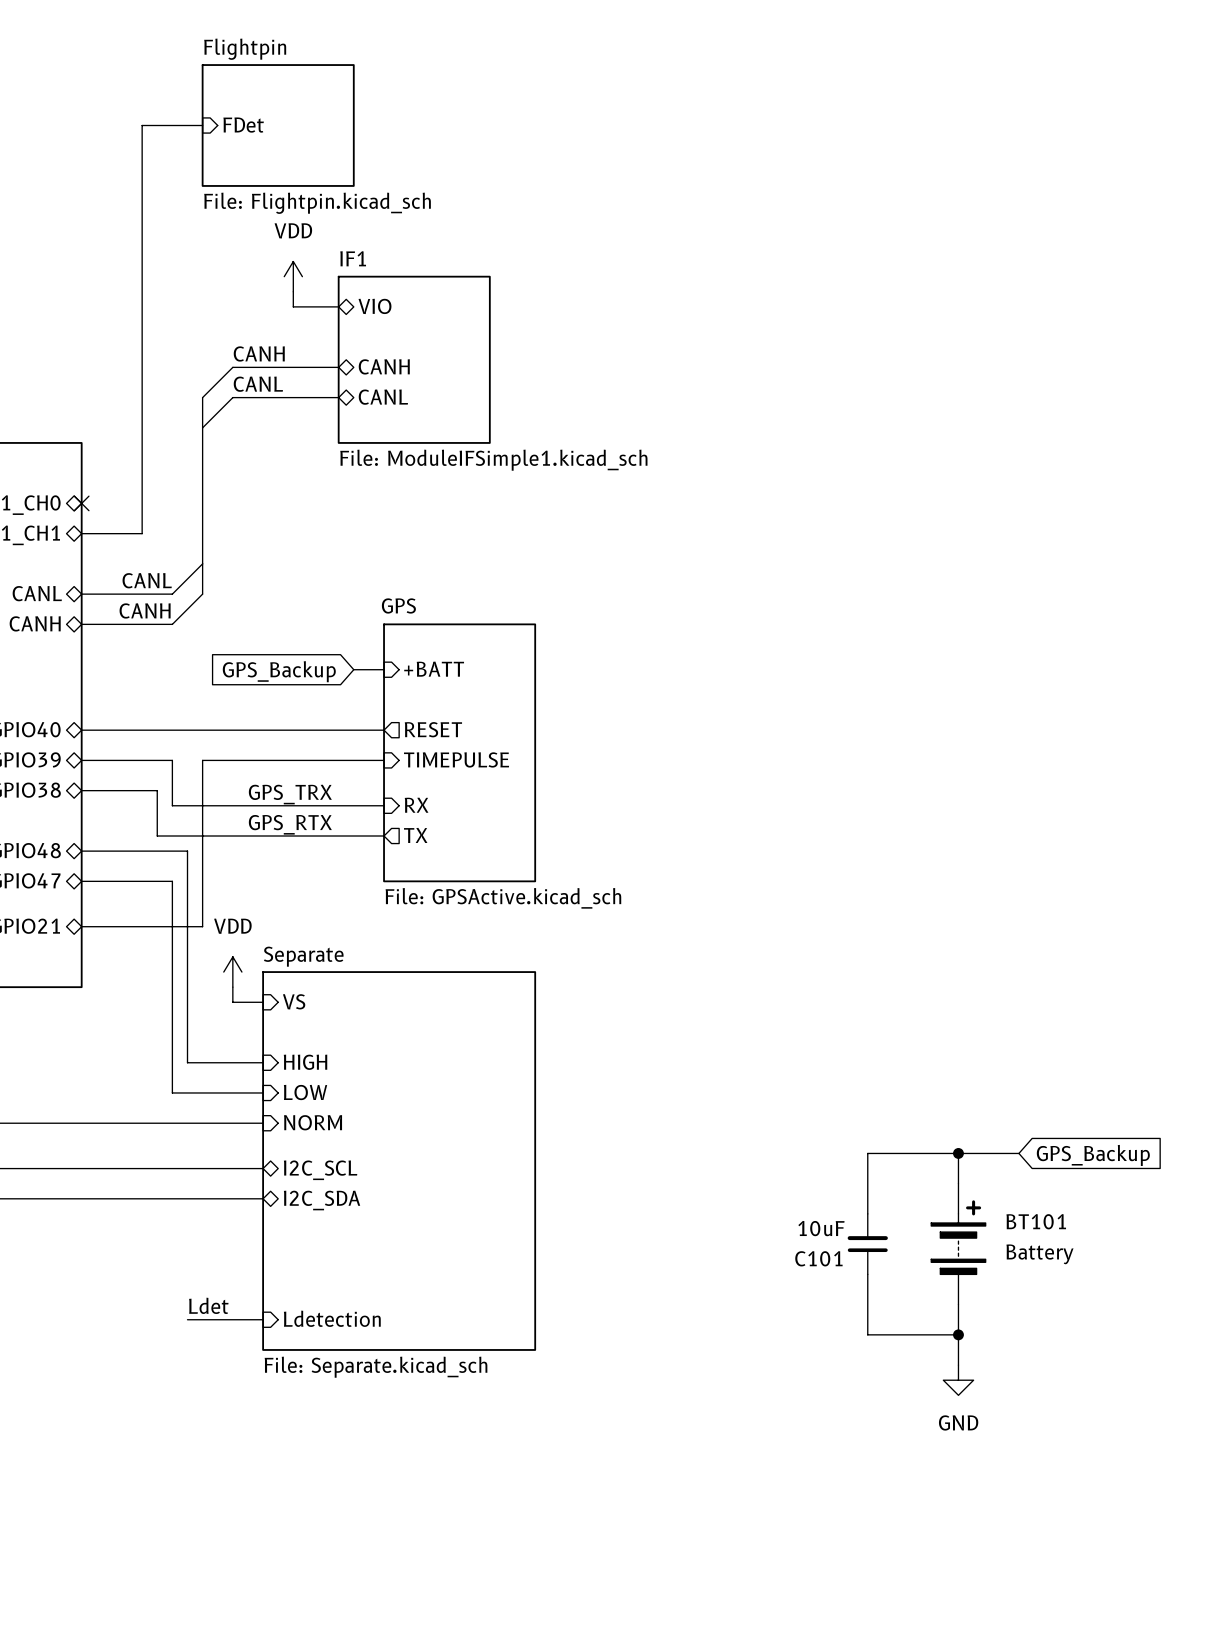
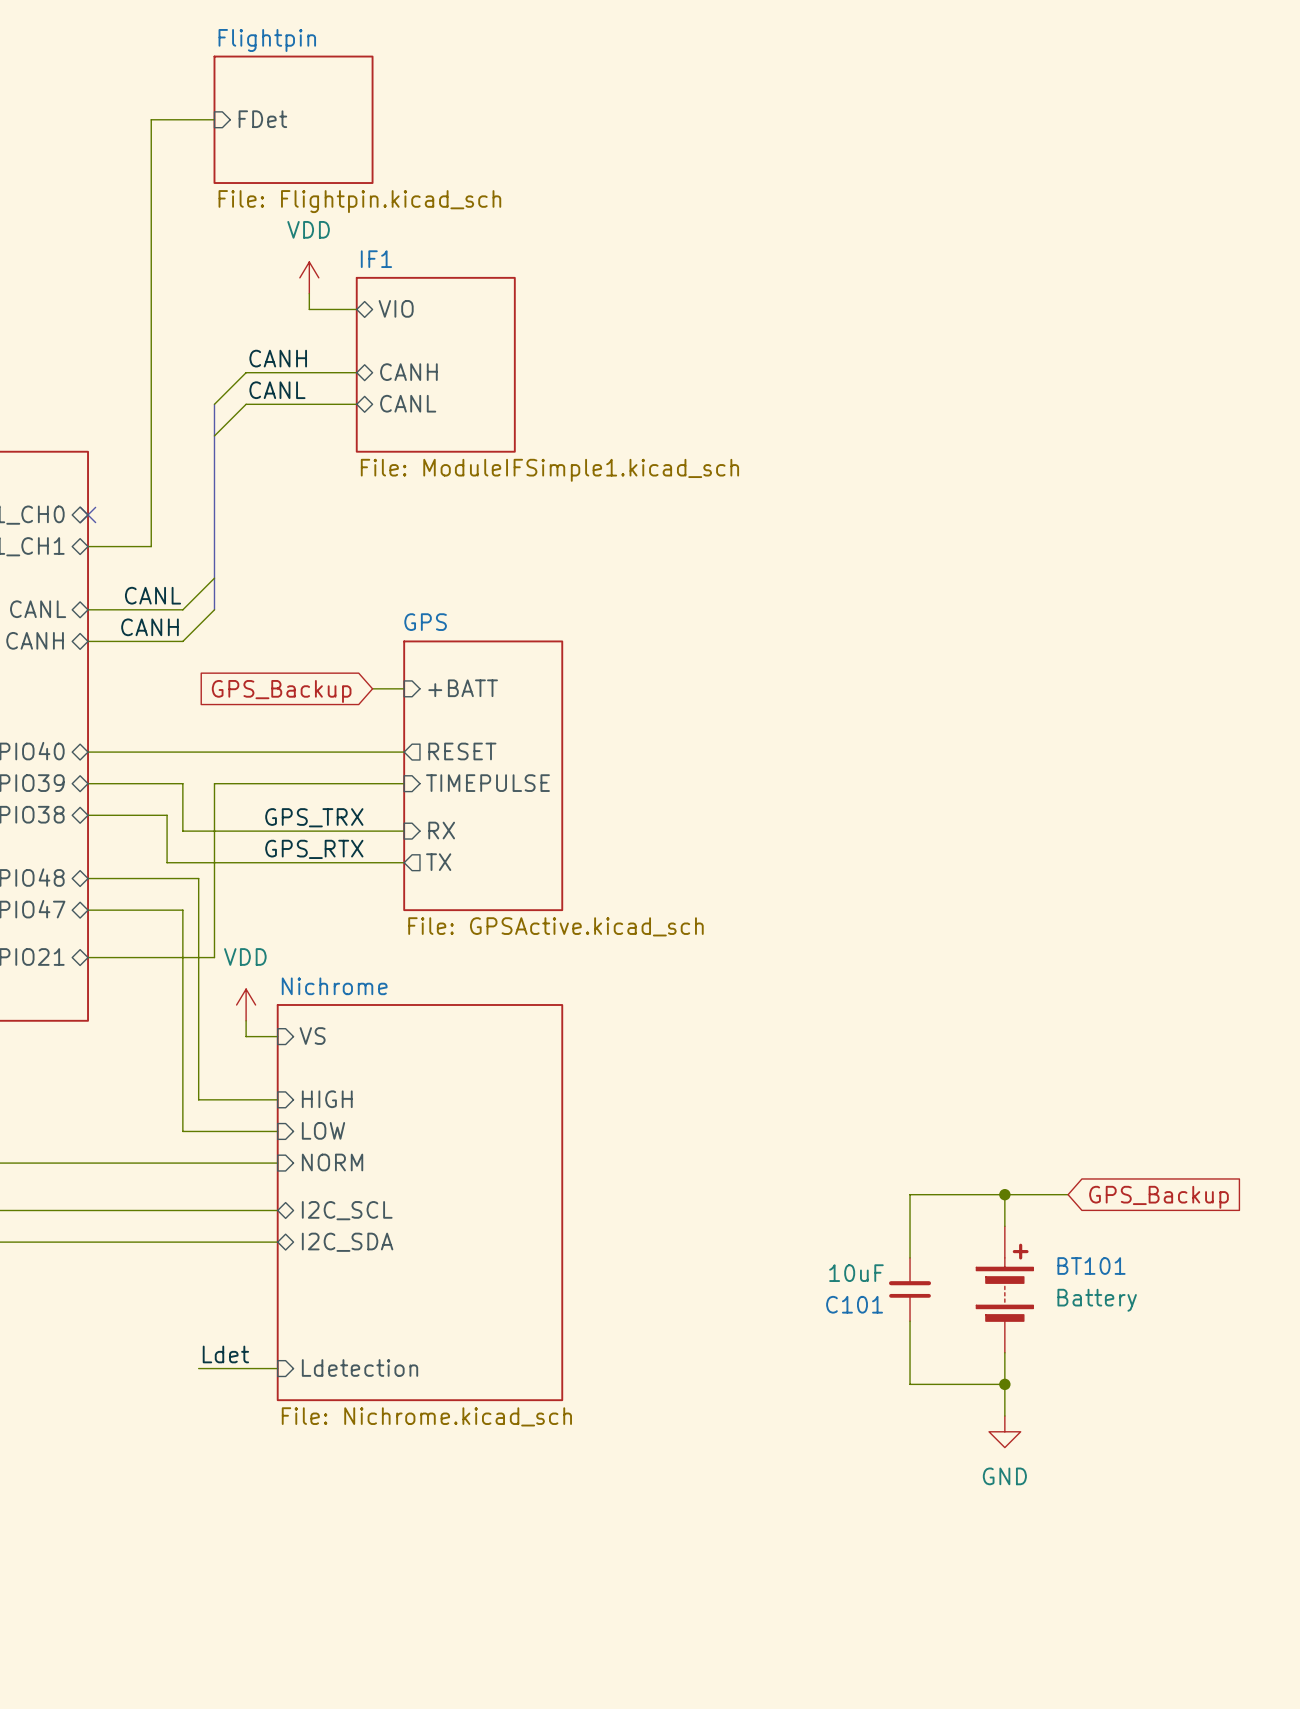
sheet Separate name: Separate (303, 956) -> Nichrome (334, 986)
sheet Separate value: File: Separate.kicad_sch (376, 1367) -> File: Nichrome.kicad_sch (426, 1416)

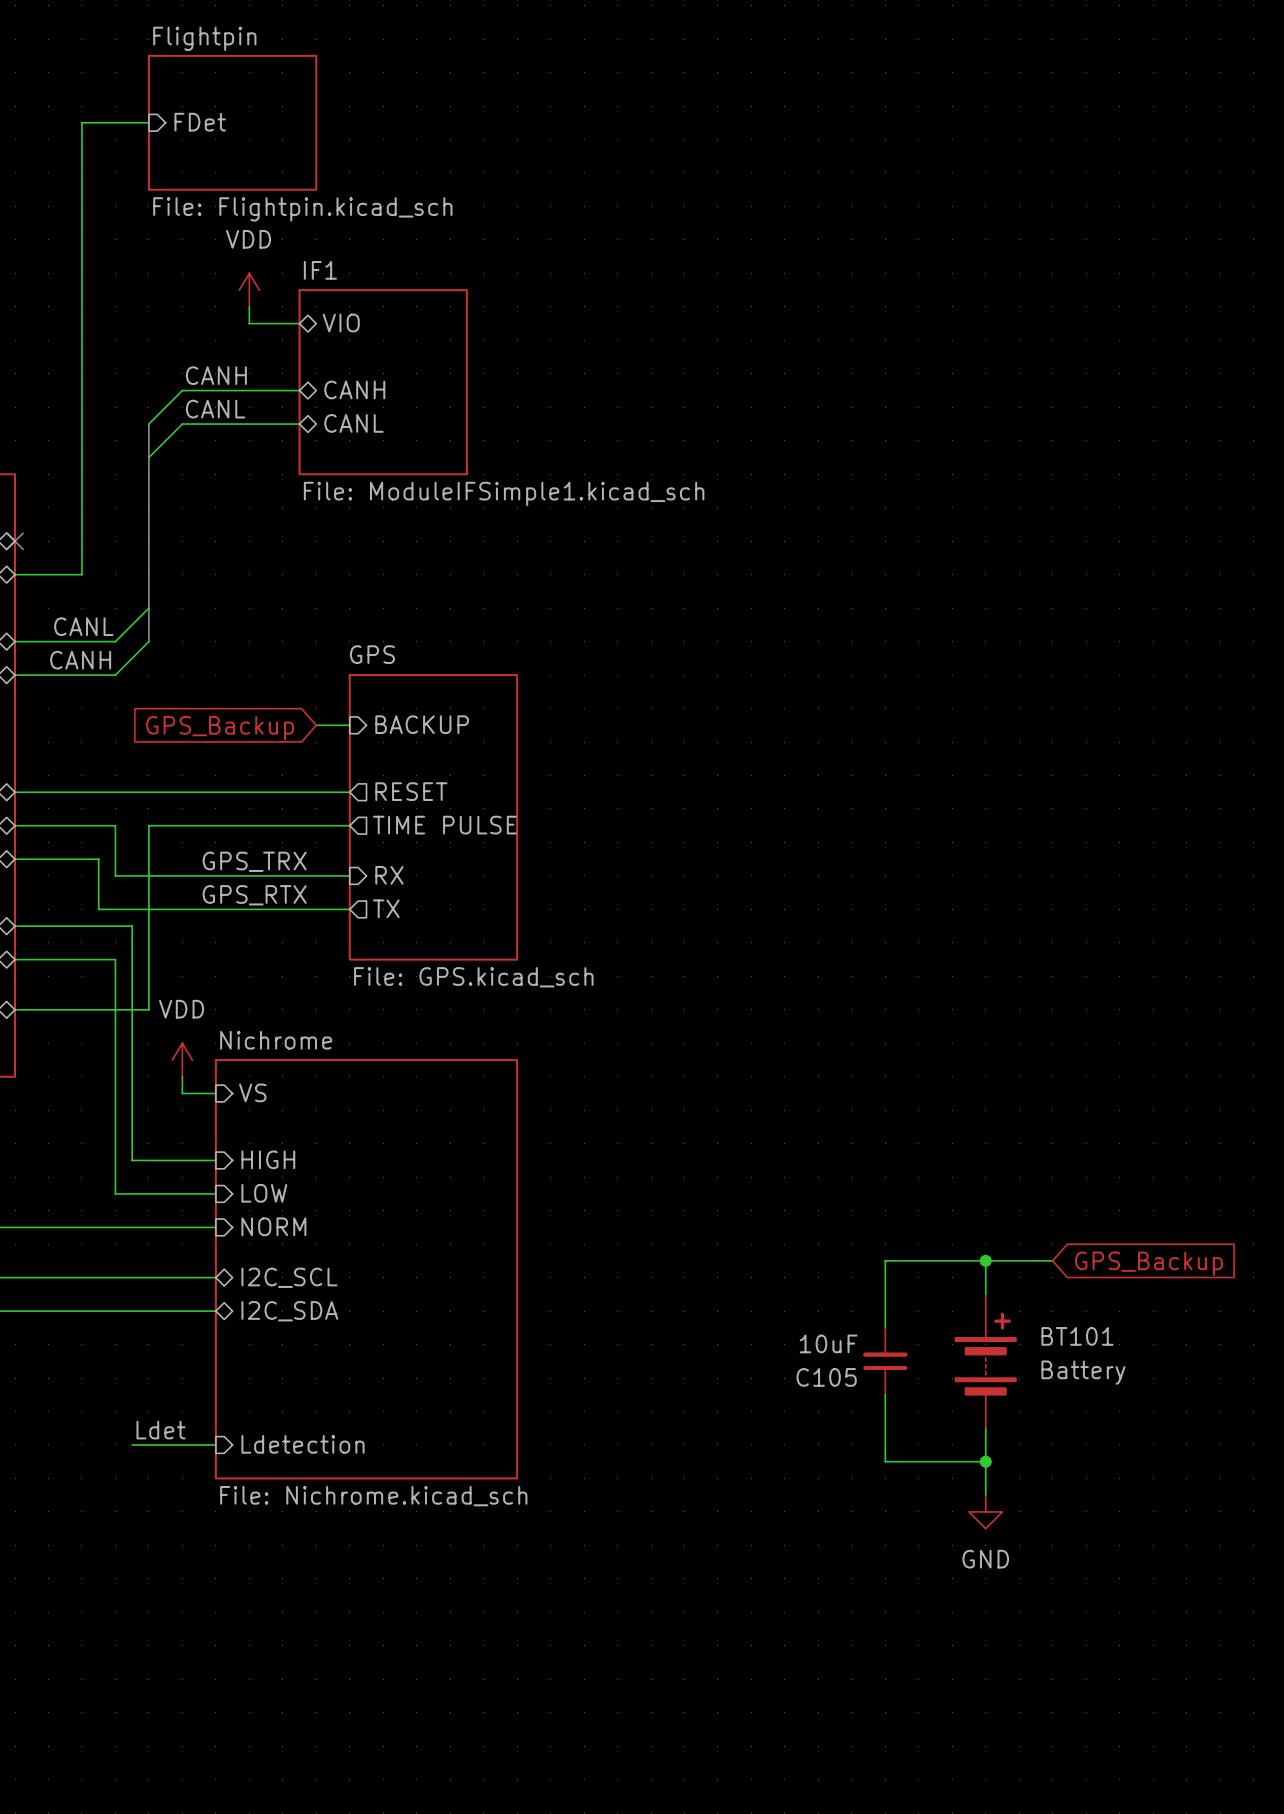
sheet pin: +BATT (463, 688) -> BACKUP (422, 724)
sheet pin shape: input (487, 783) -> output (444, 825)
sheet pin: TIMEPULSE (487, 783) -> TIME PULSE (444, 825)
sheet GPS value: File: GPSActive.kicad_sch (555, 926) -> File: GPS.kicad_sch (473, 977)
C101 name: C101 (854, 1304) -> C105 (826, 1377)

